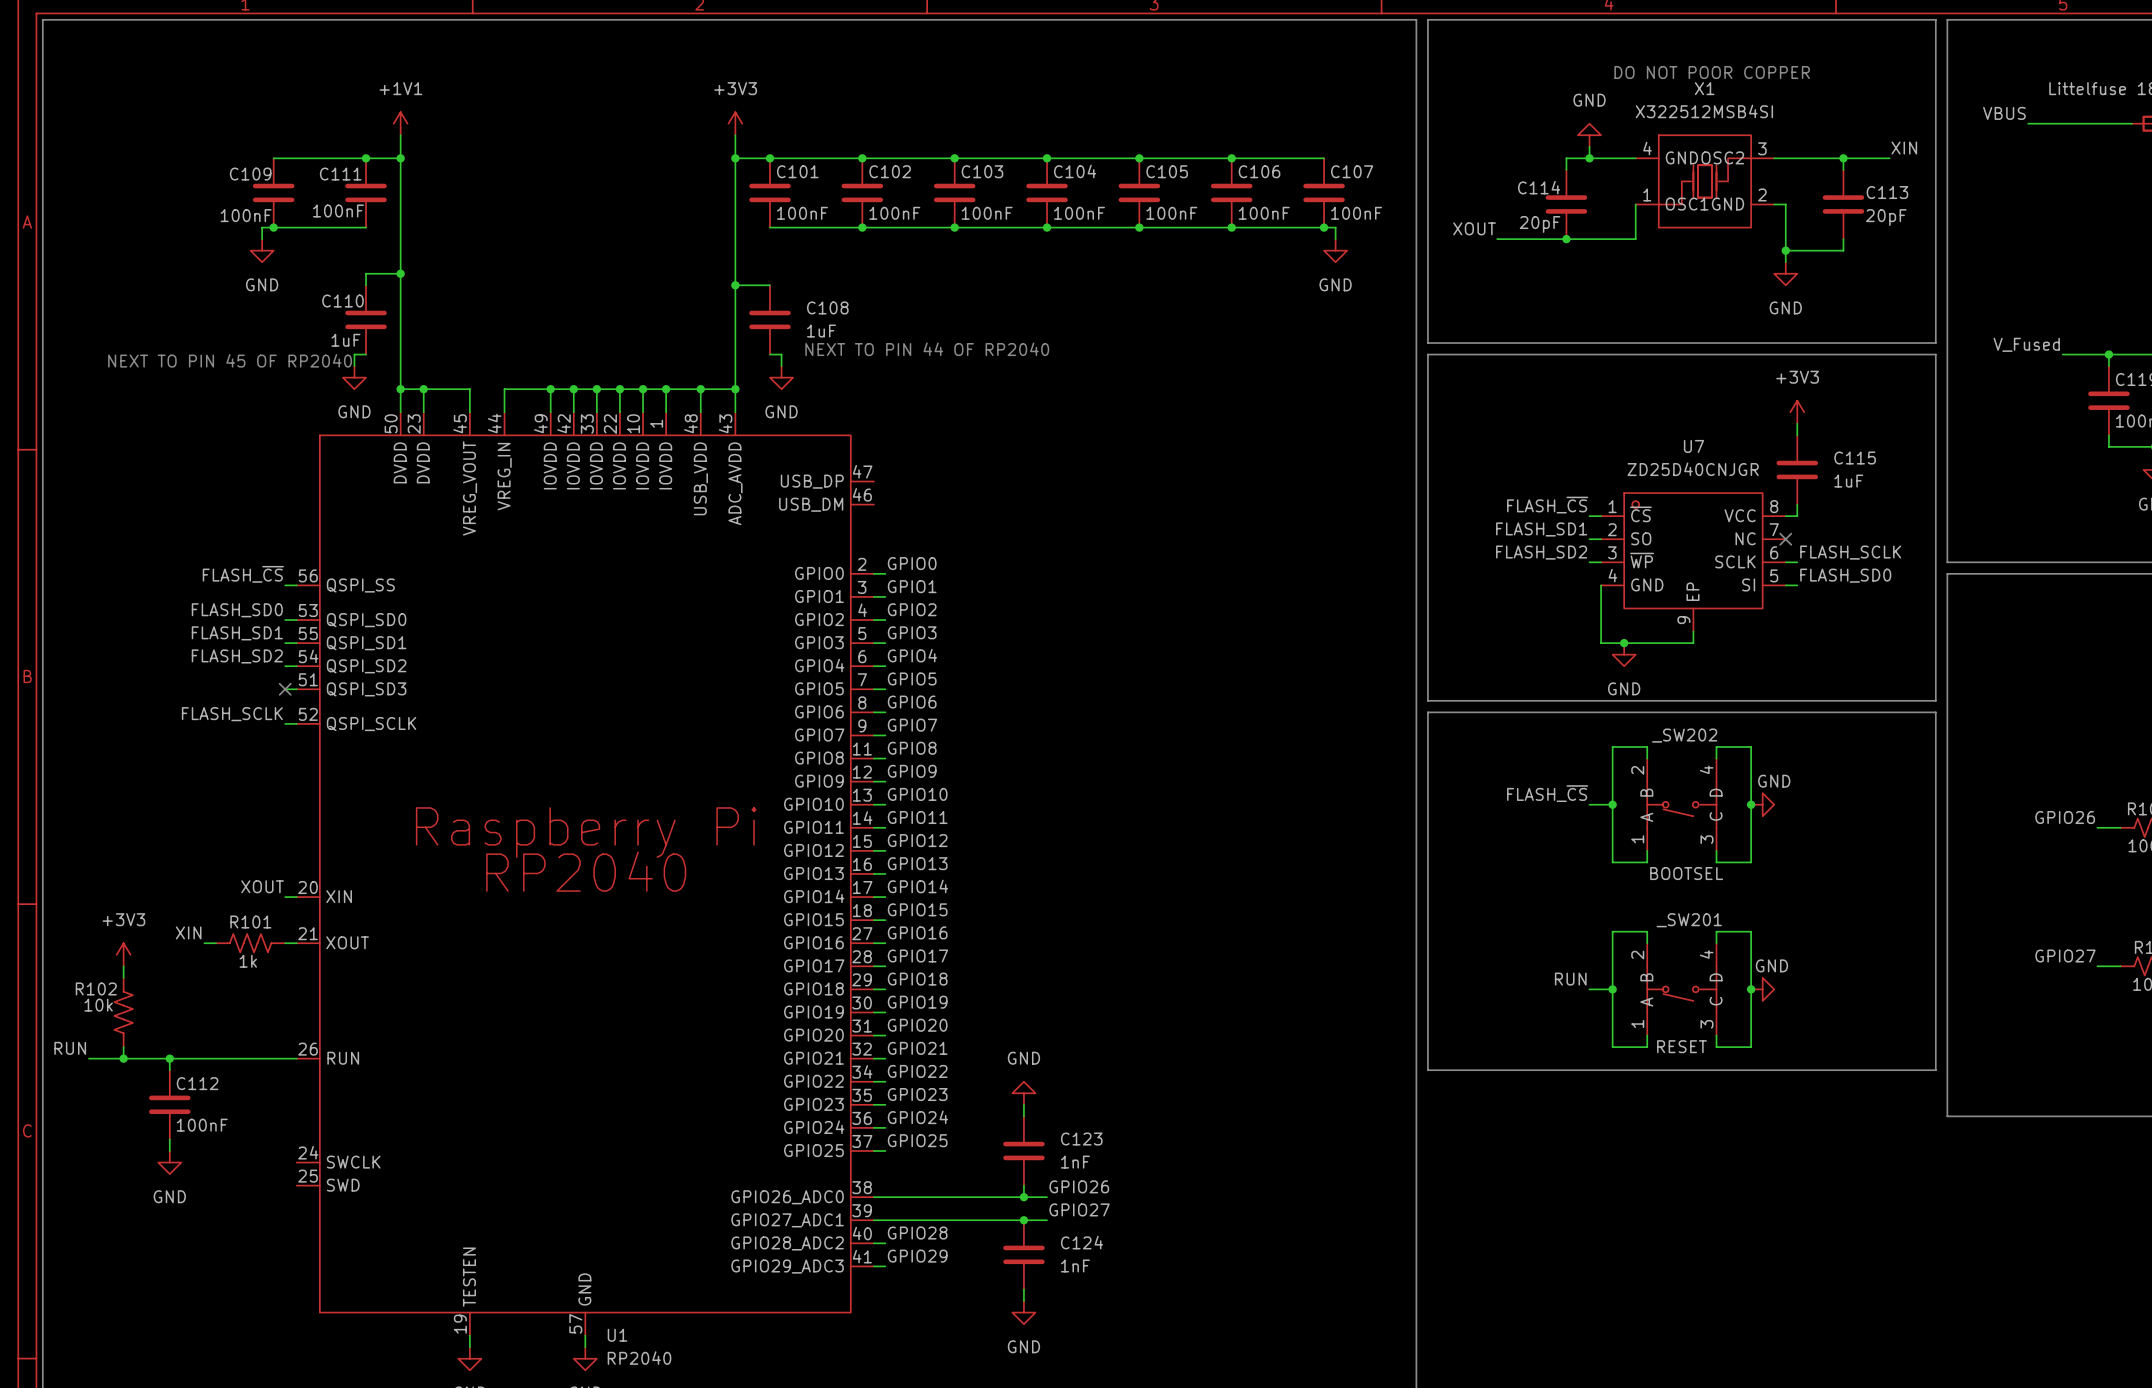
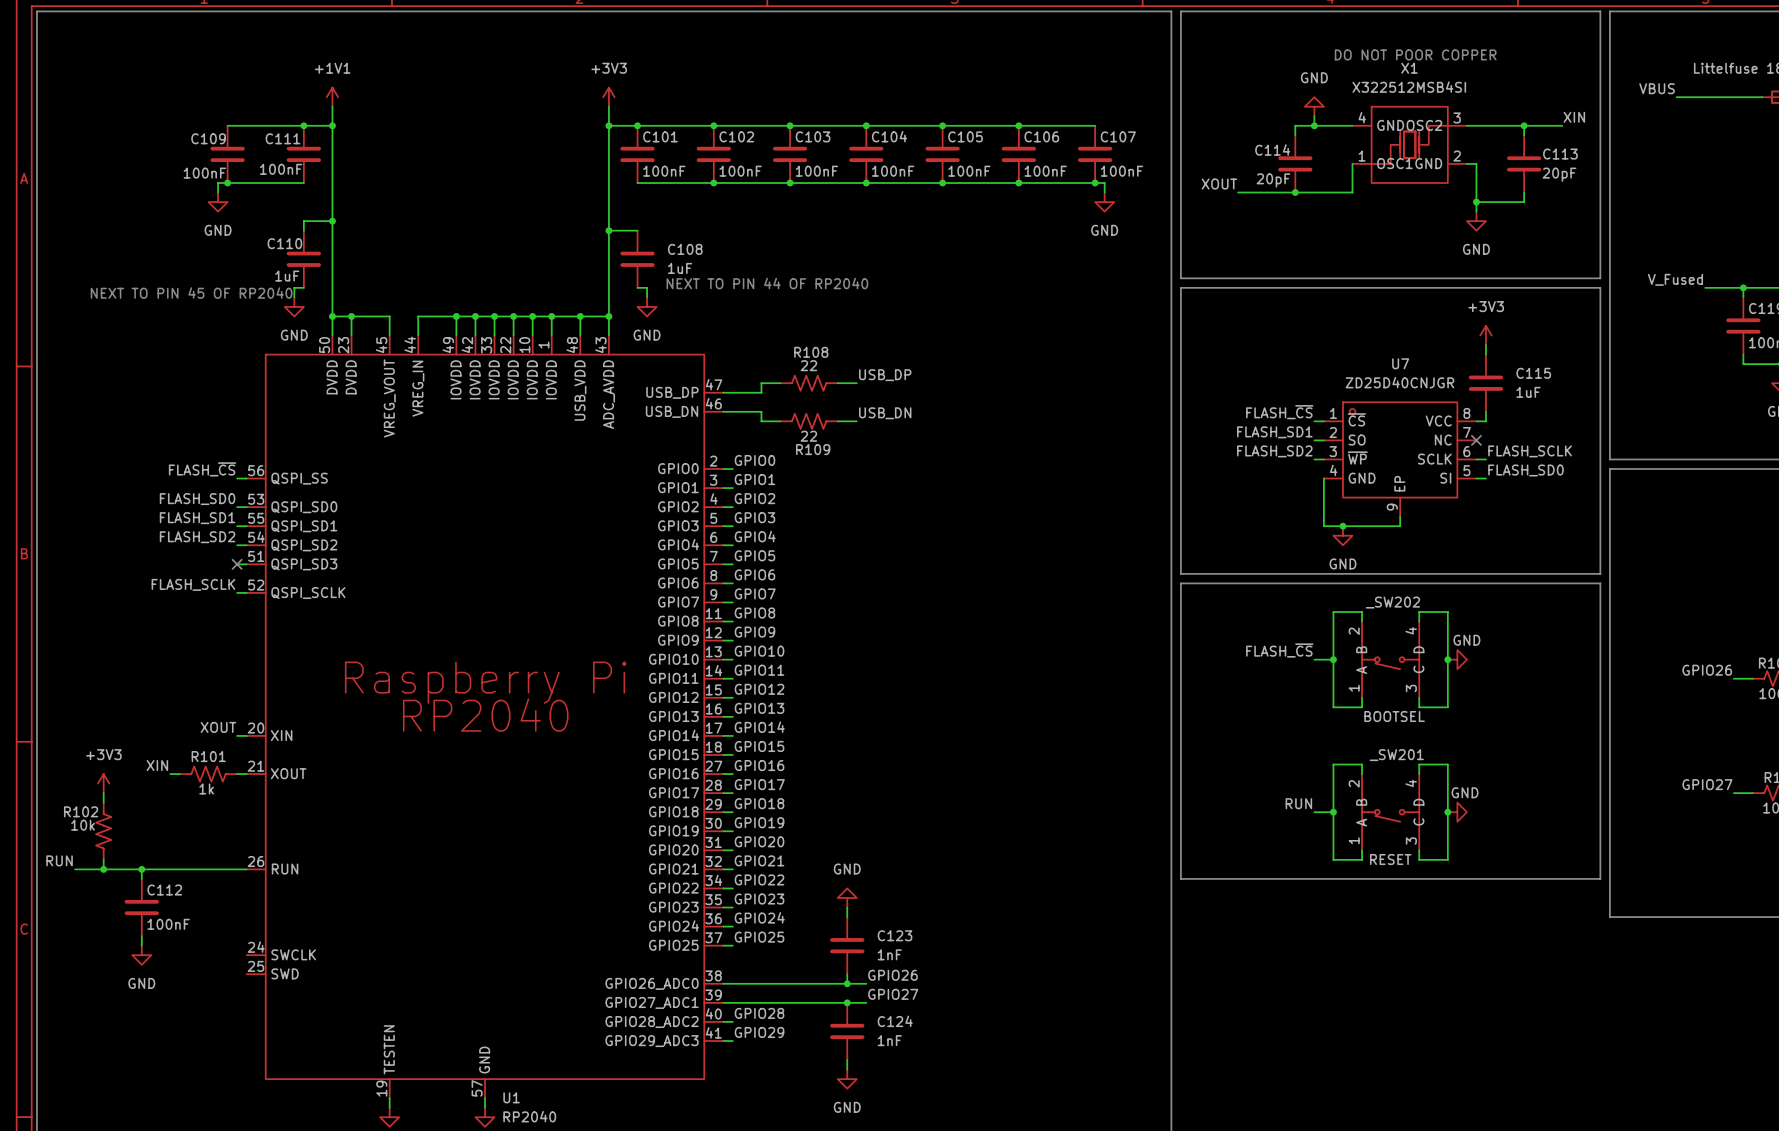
label: none -> USB_DP (885, 375)
wire: none -> (780, 383) (761, 383) (761, 392) (723, 392)
R108: none -> 22 (809, 383)
wire: none -> (837, 383) (856, 383)
U1 pin name: USB_DM (811, 504) -> USB_DN (672, 411)
wire: none -> (723, 411) (761, 411) (761, 421) (780, 421)
label: none -> USB_DN (885, 413)
R109: none -> 22 (809, 421)
wire: none -> (837, 421) (856, 421)

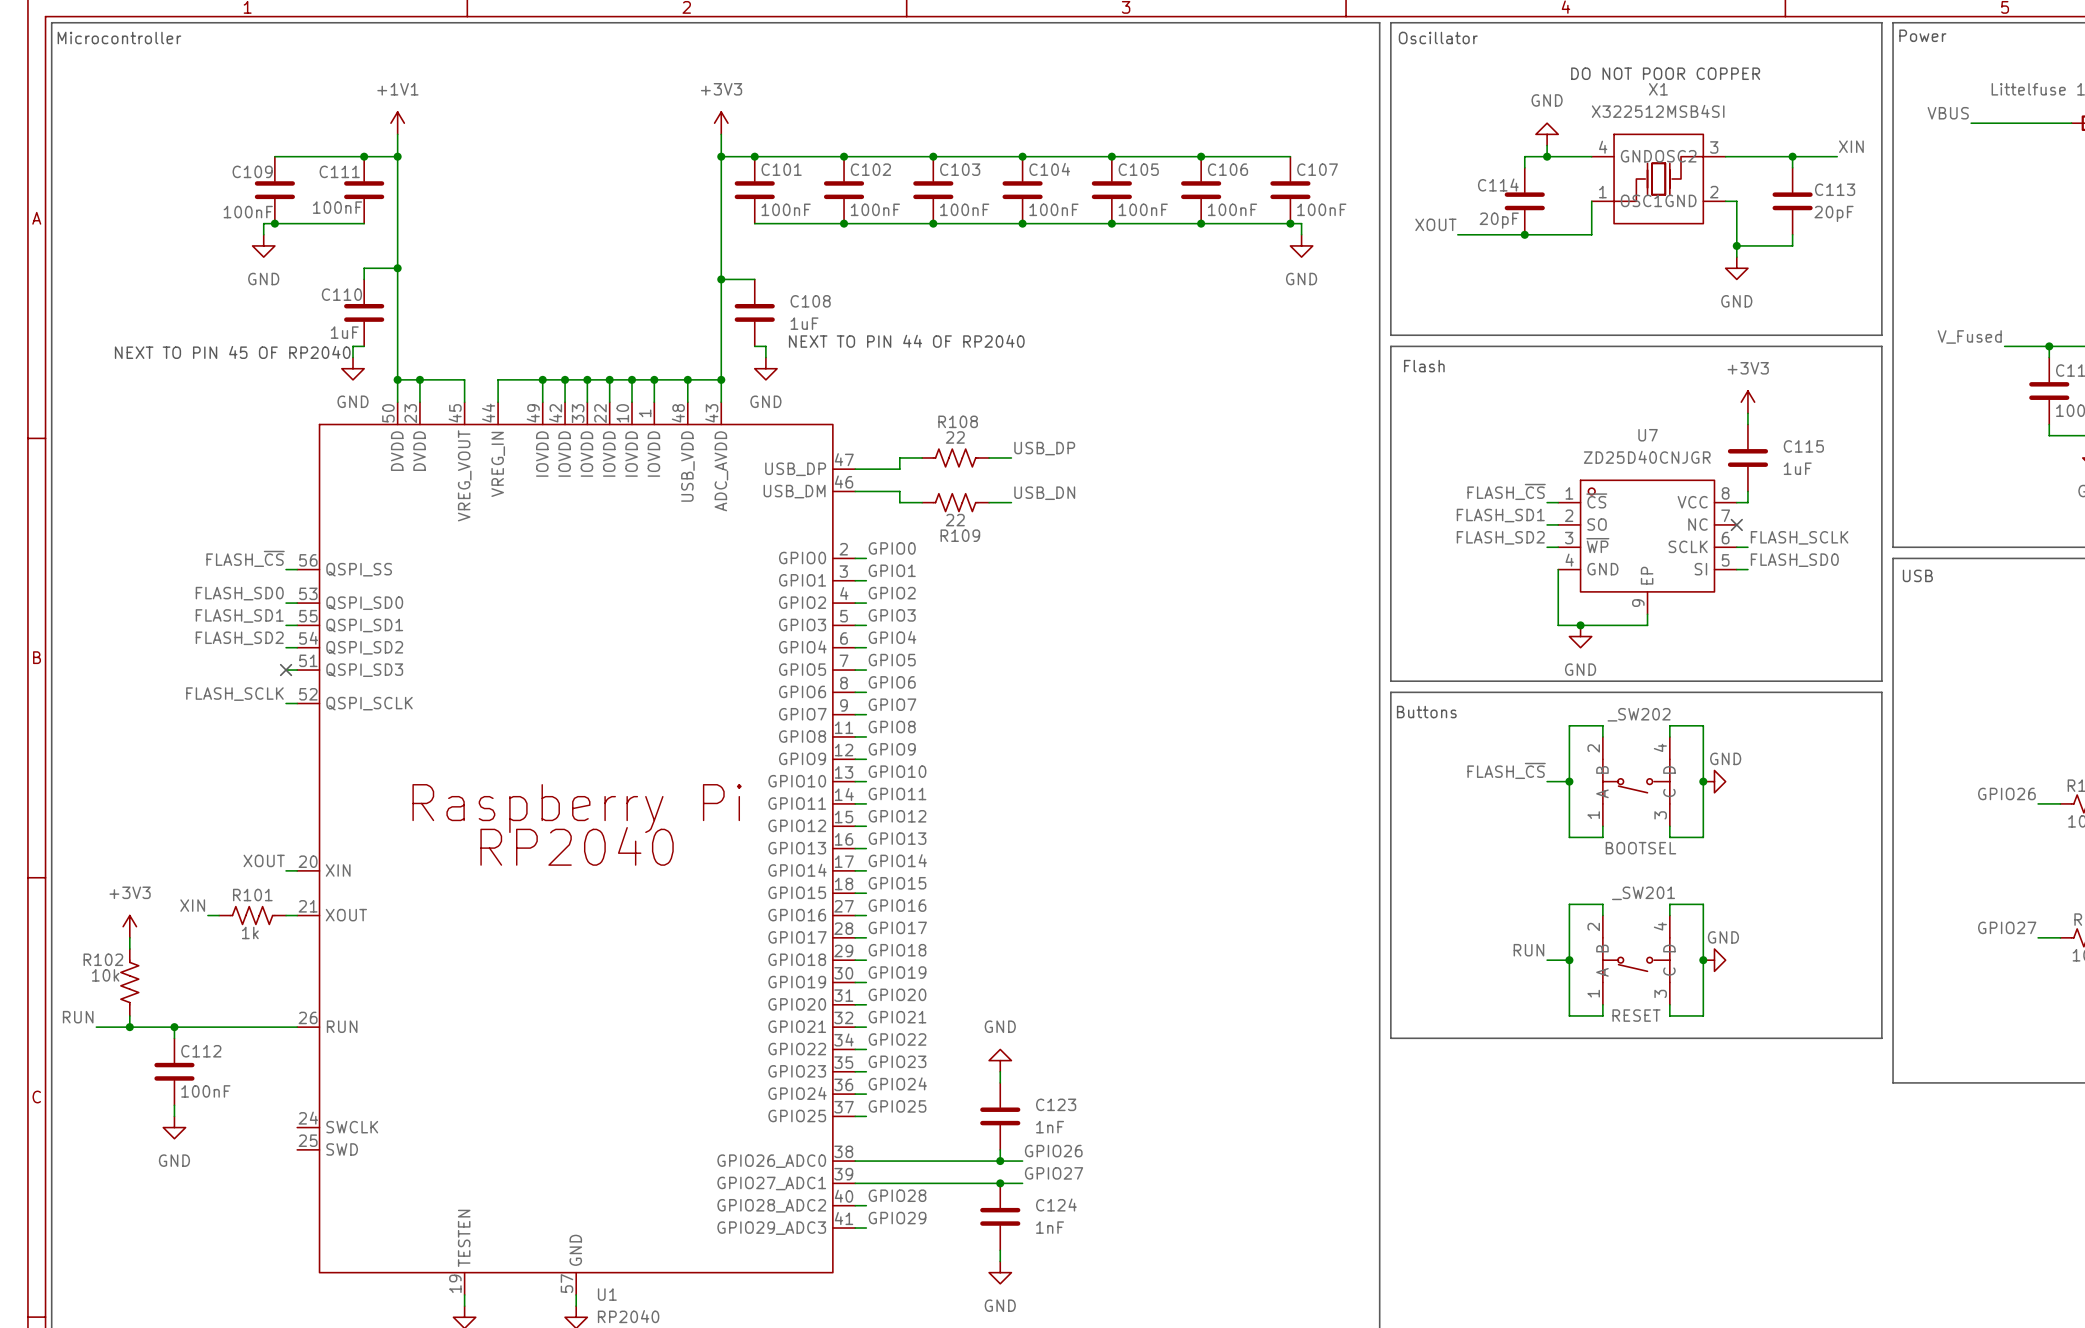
text: none -> Power (1922, 35)
text: none -> Microcontroller (119, 38)
text: none -> Oscillator (1438, 38)
text: none -> Flash (1424, 366)
U1 pin name: USB_DN (672, 411) -> USB_DM (794, 491)
text: none -> USB (1917, 575)
text: none -> Buttons (1426, 712)

